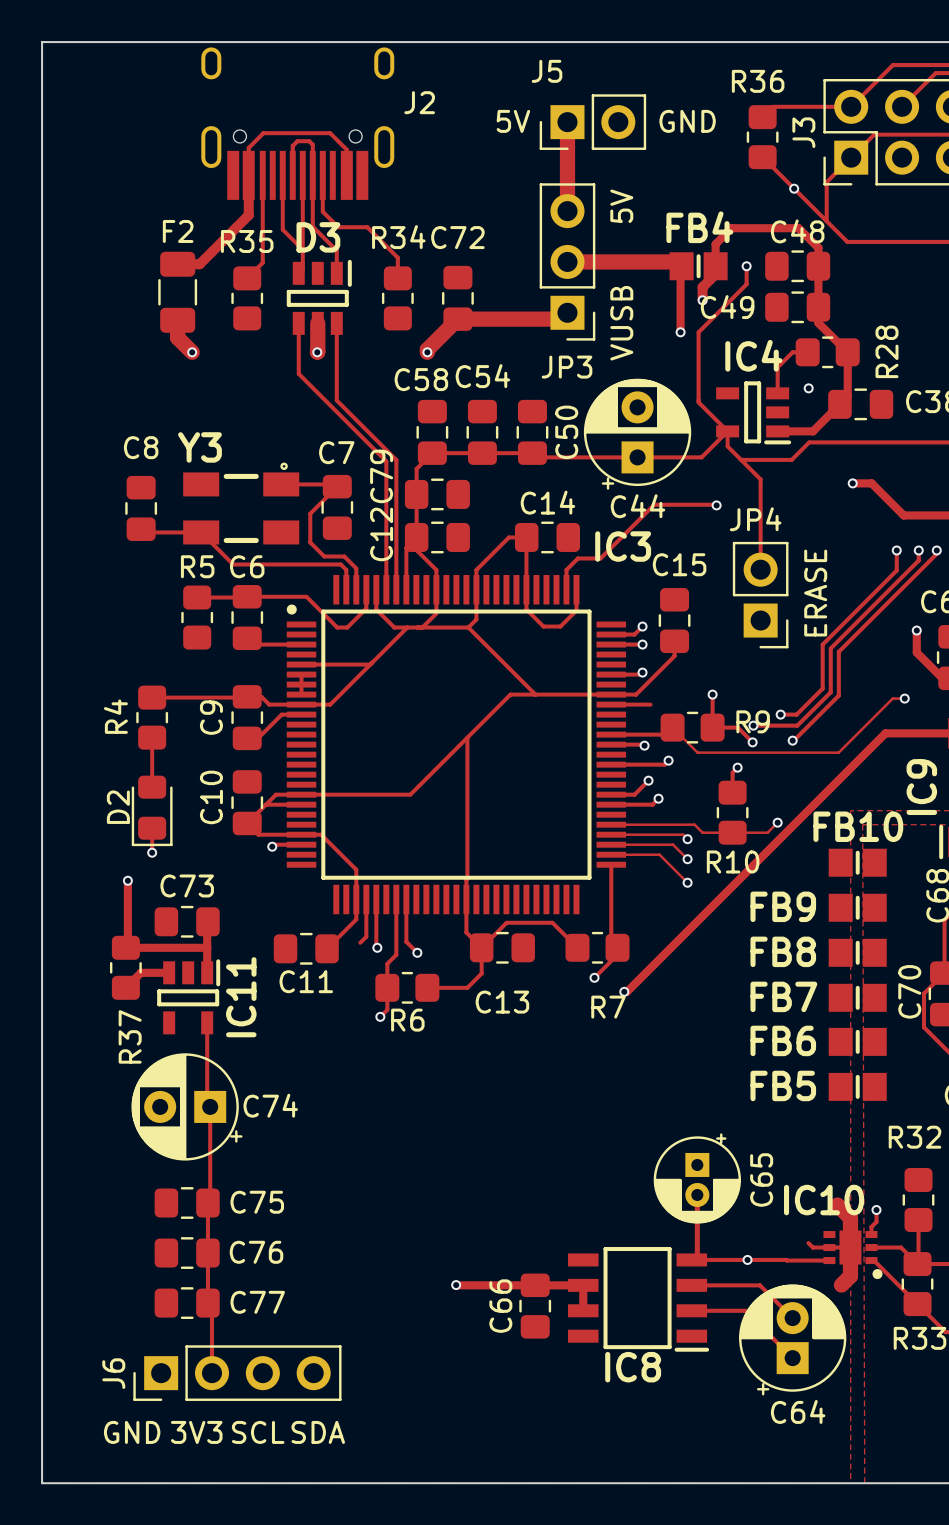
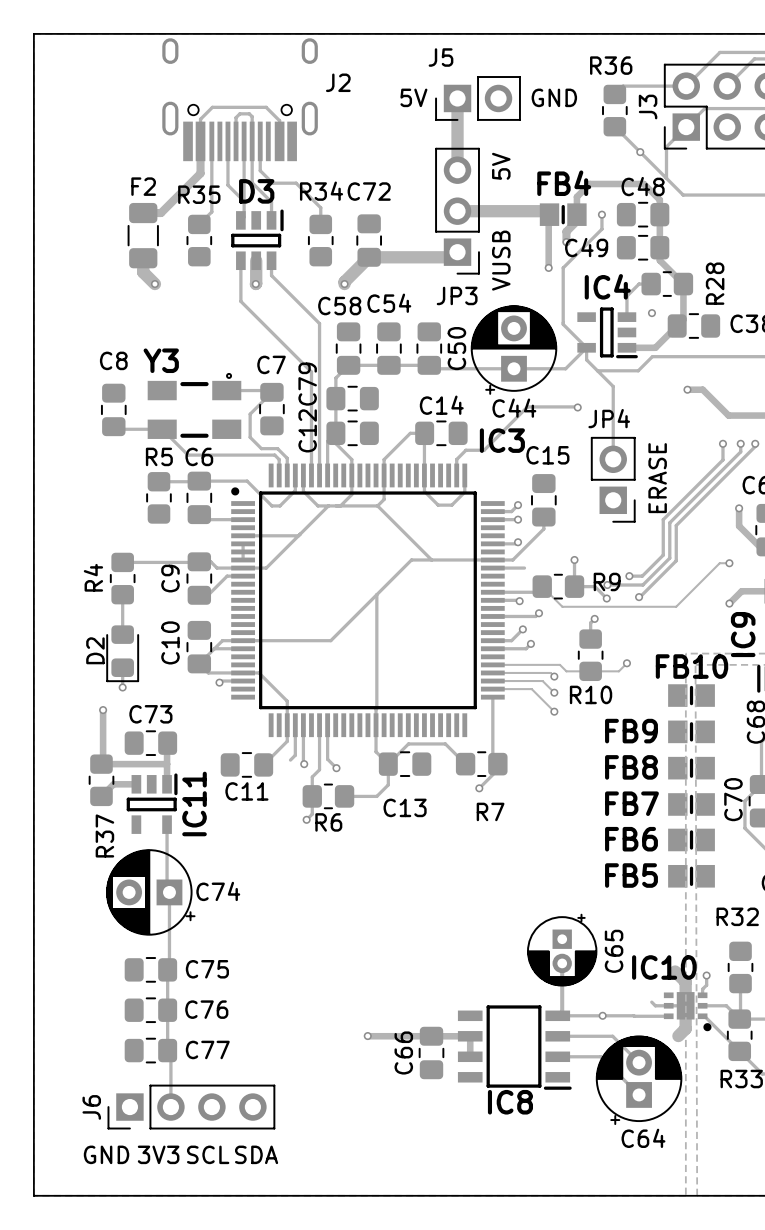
track: (336, 341) (336, 400) (396, 460) -> (271, 275) (319, 323) (319, 370)
track: (920, 733) (885, 733) (627, 991) (624, 991) -> (741, 591) (729, 603)
via: none -> (729, 603)
via: (624, 991) -> none

